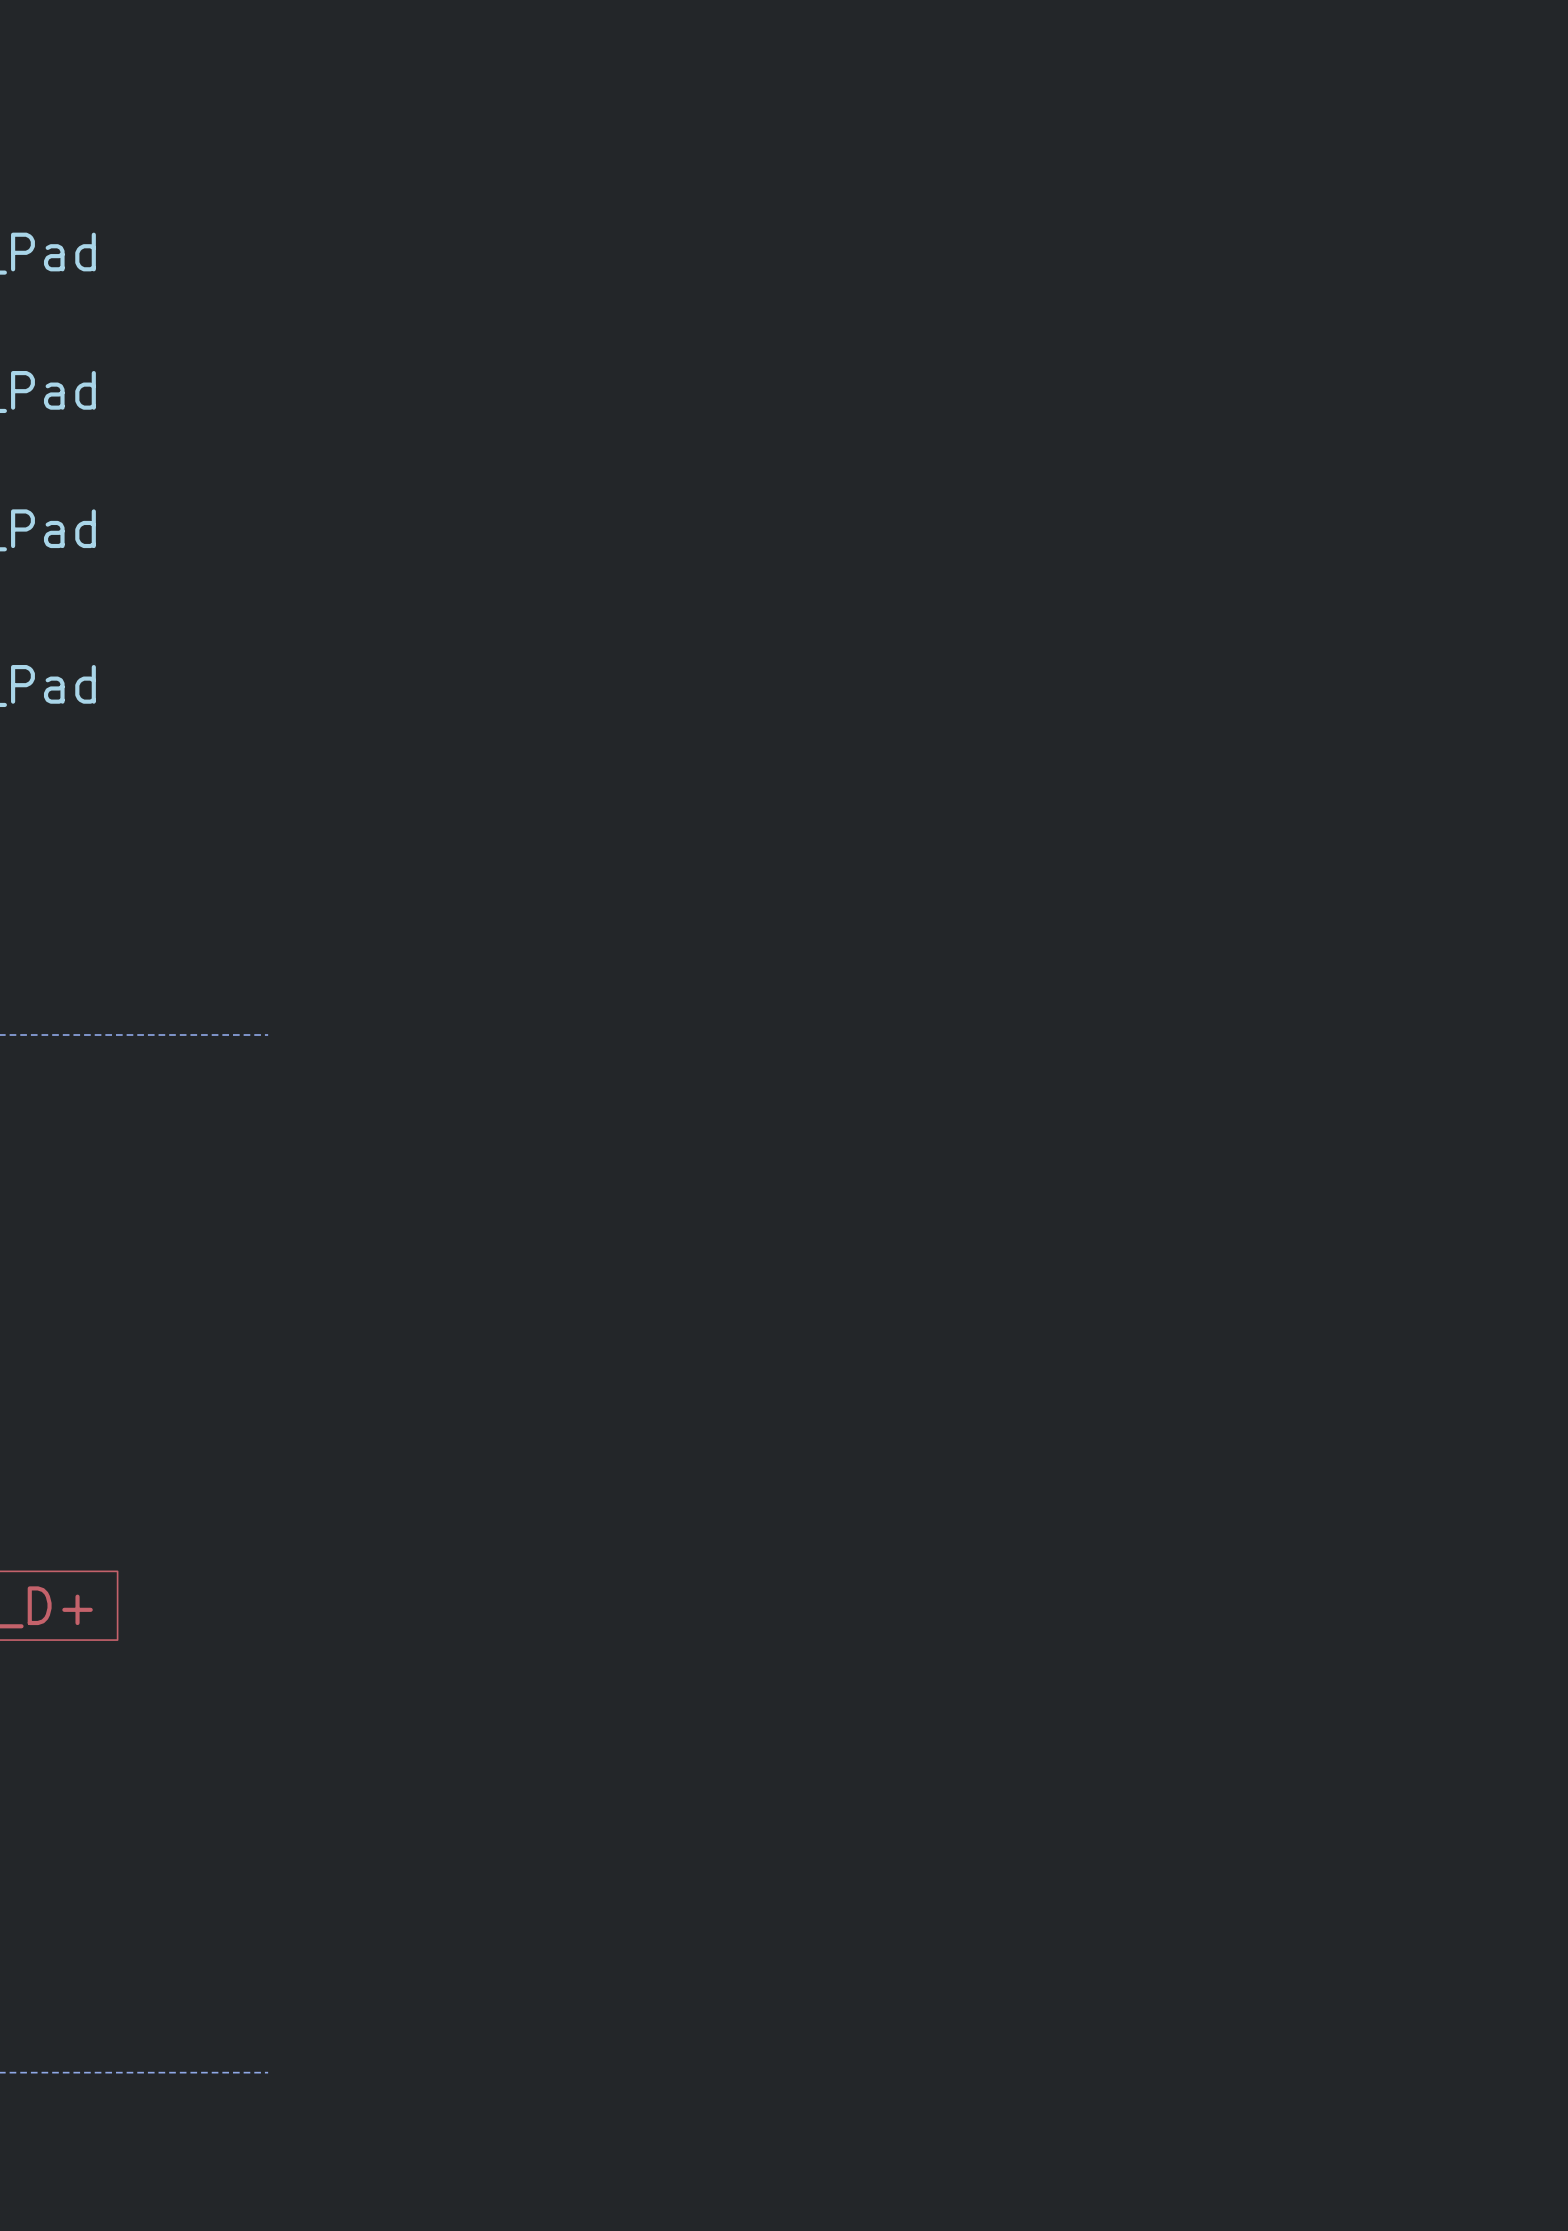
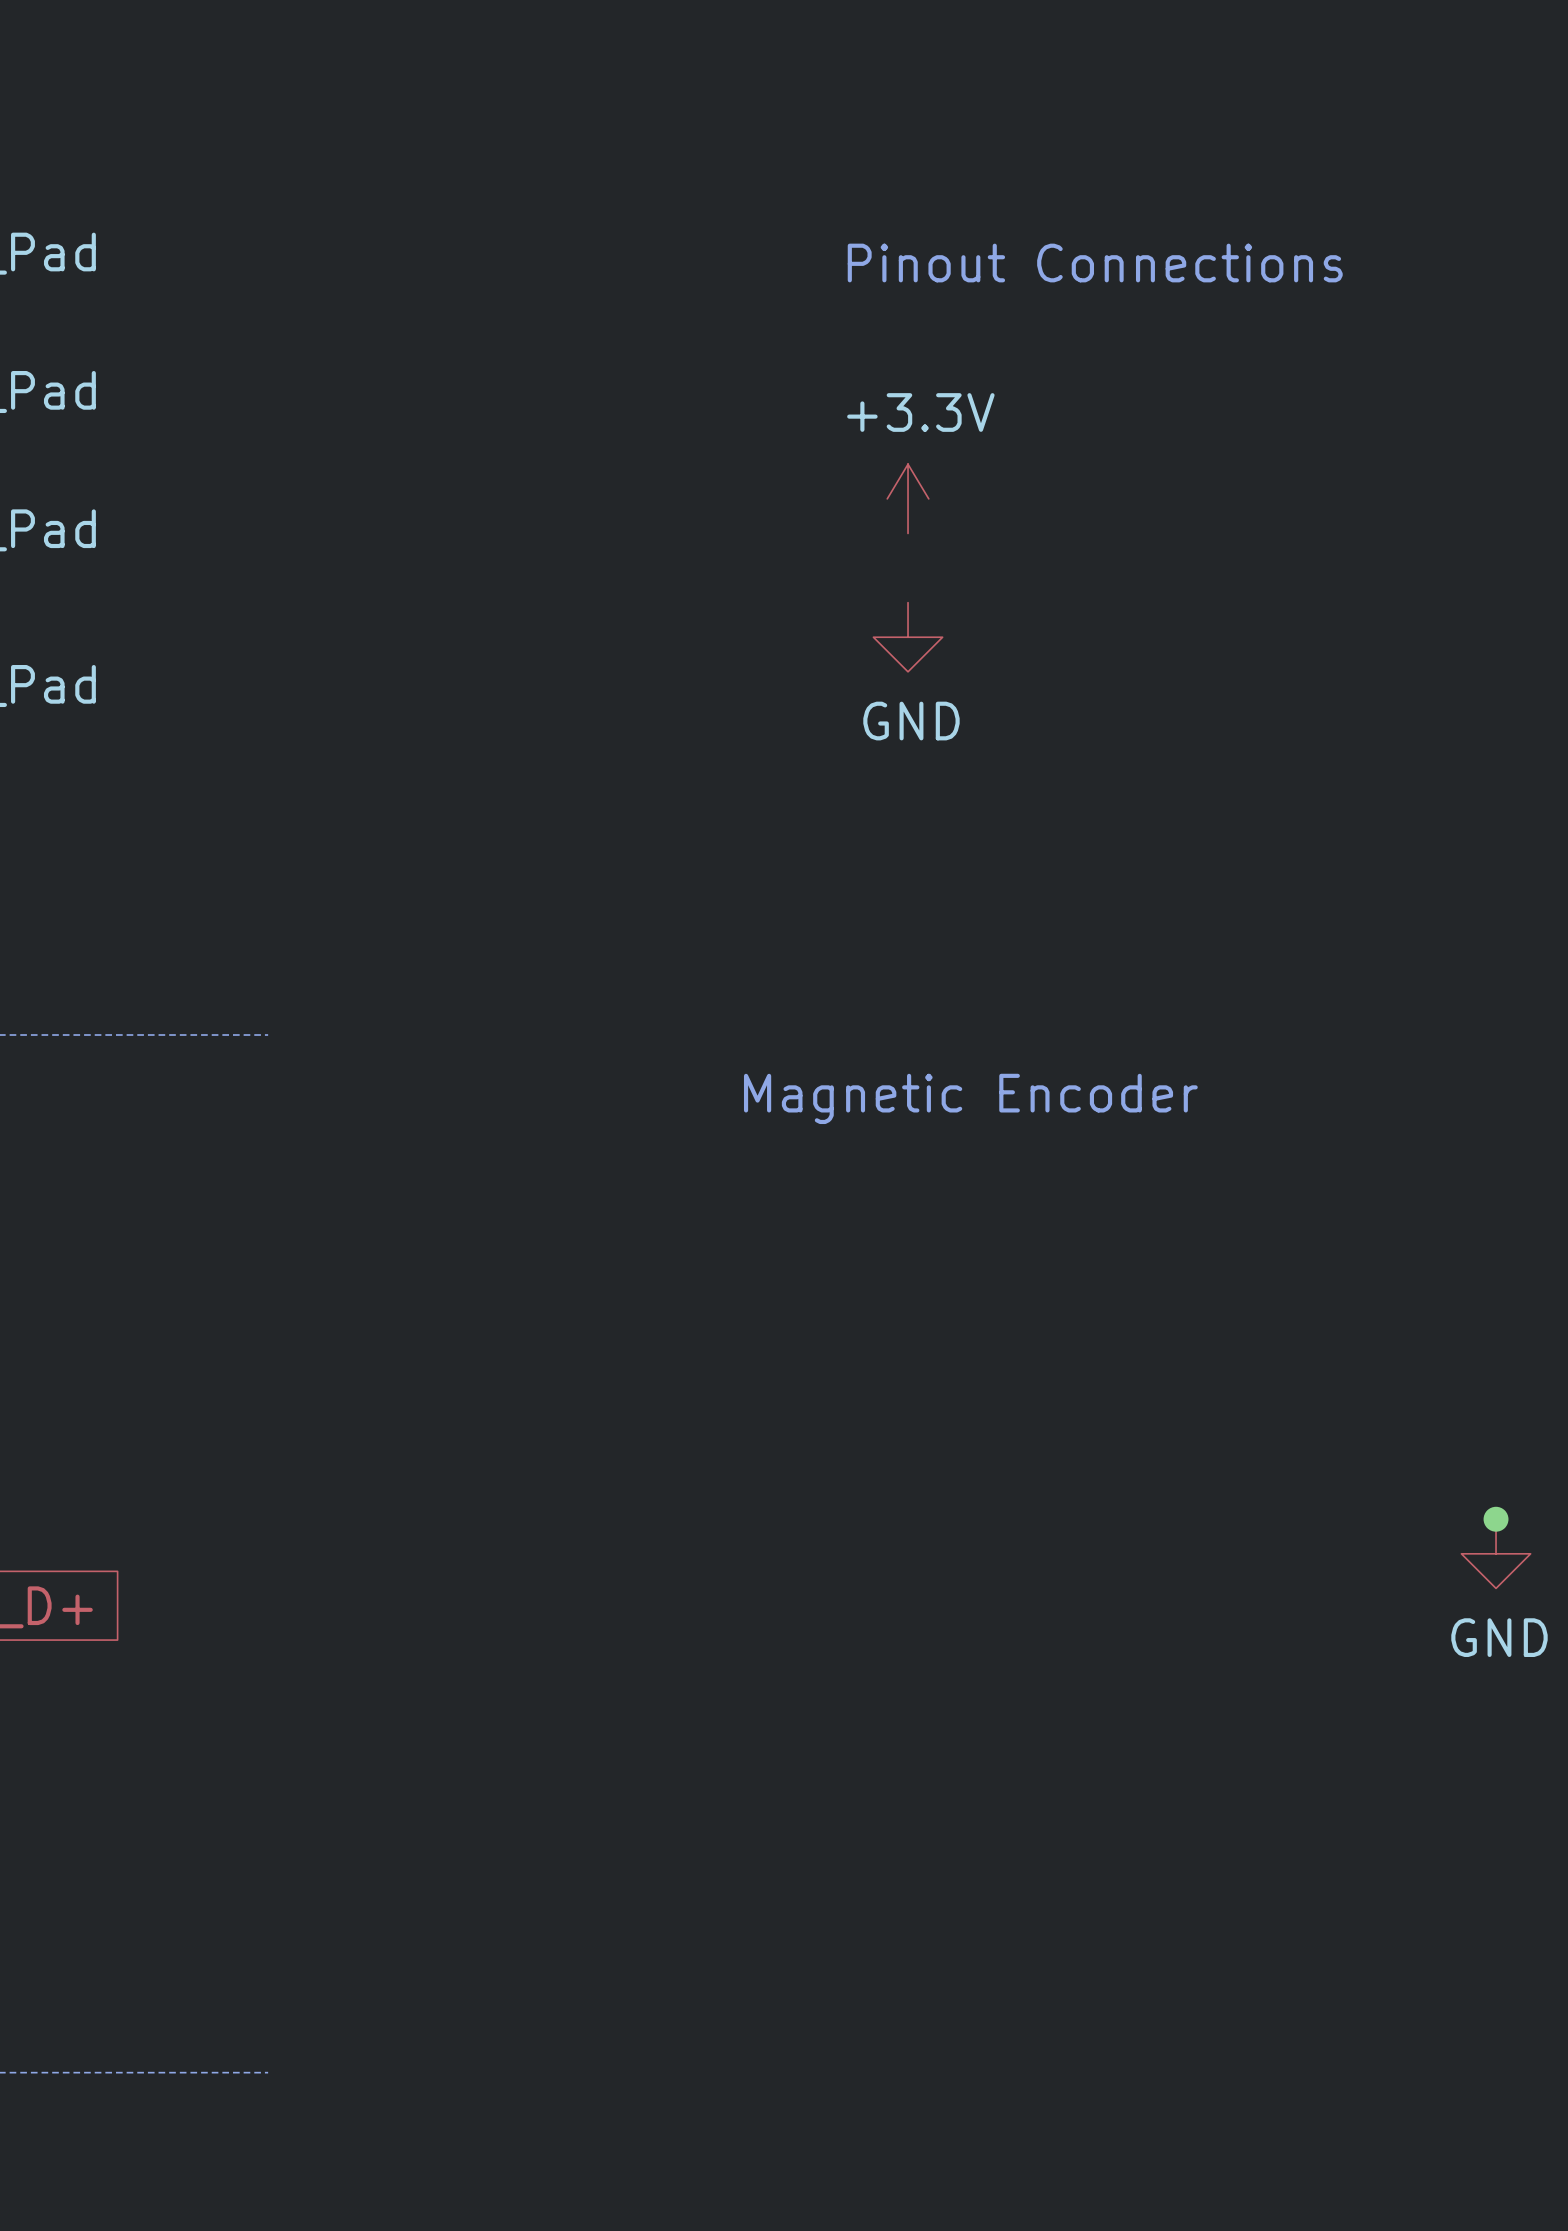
text: none -> Pinout Connections (1095, 263)
power symbol: none -> +3.3V (908, 498)
power symbol: none -> GND (908, 637)
text: none -> Magnetic Encoder (970, 1098)
junction: none -> (1496, 1519)
power symbol: none -> GND (1496, 1553)

